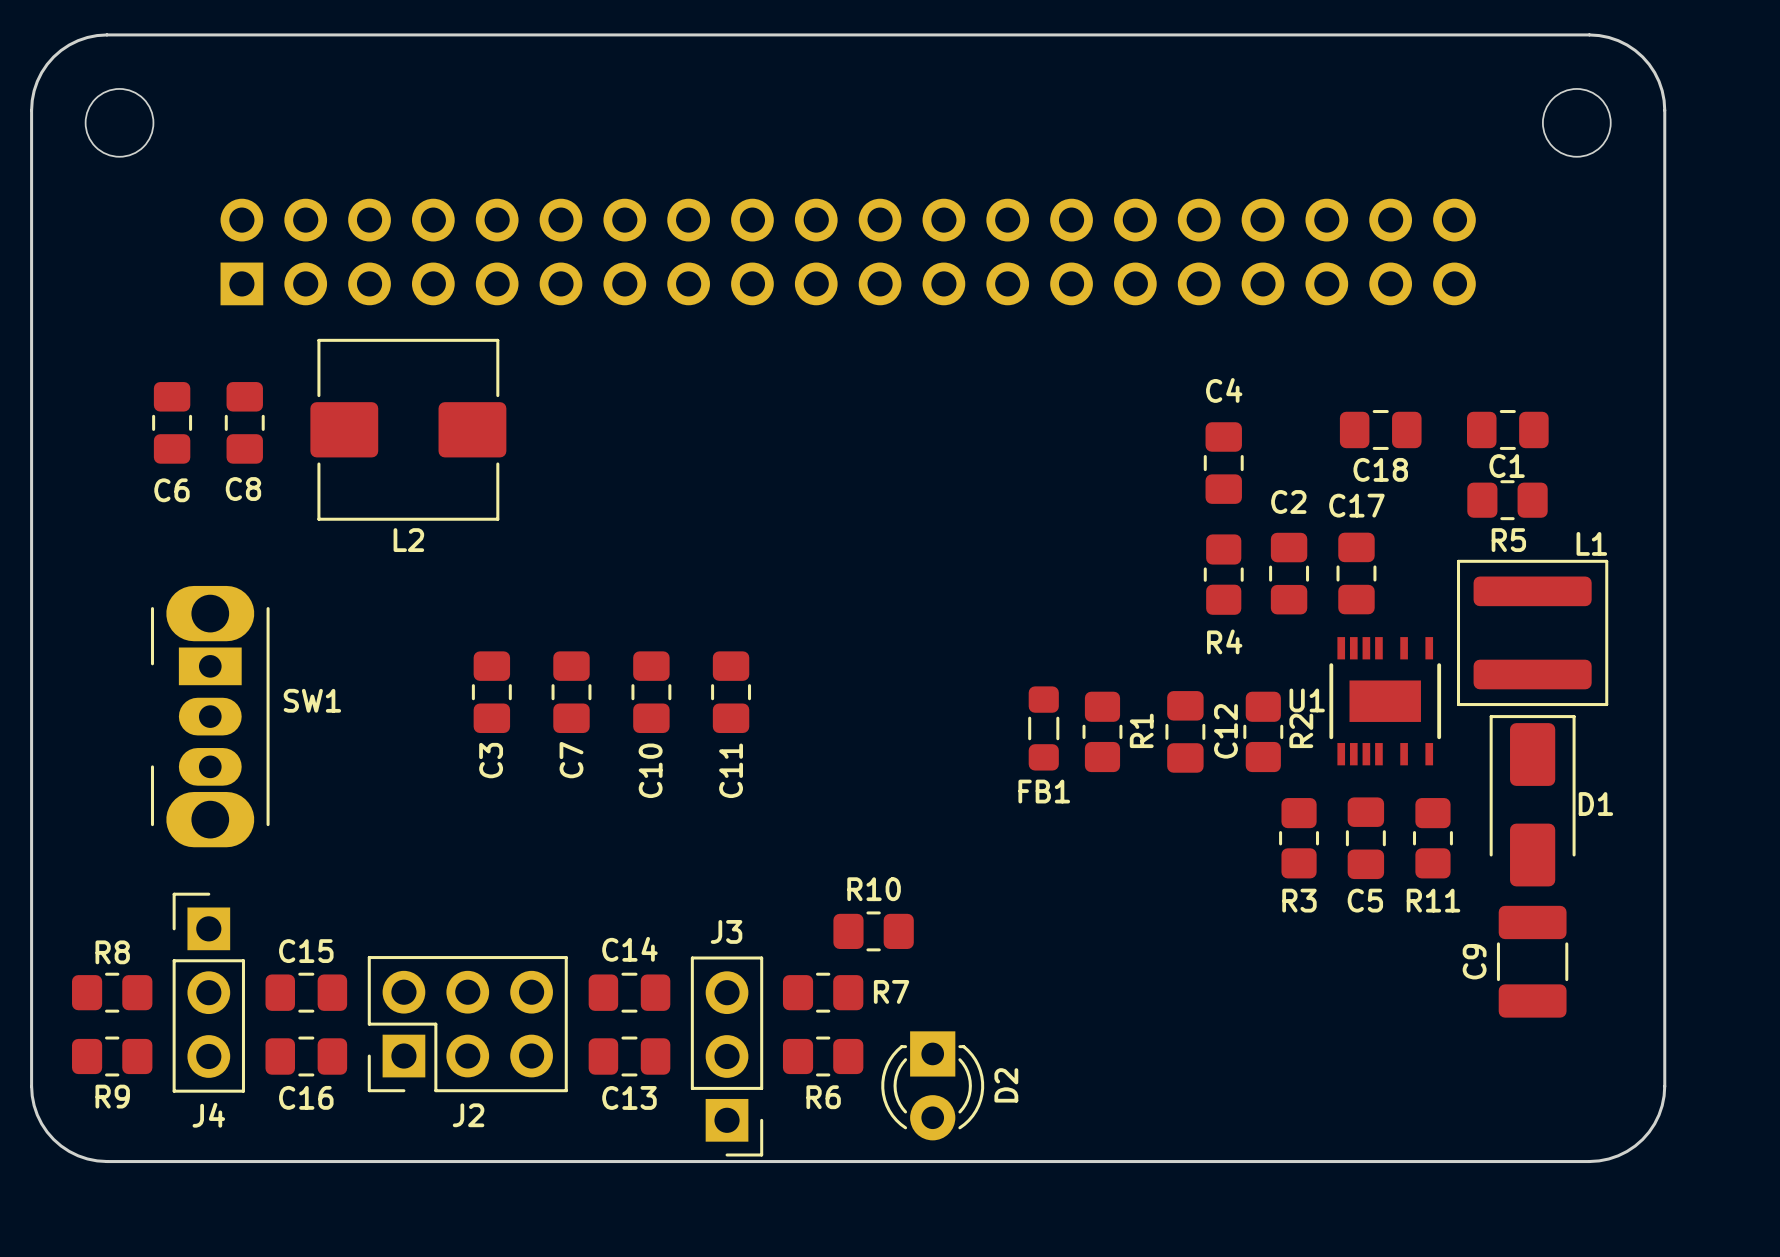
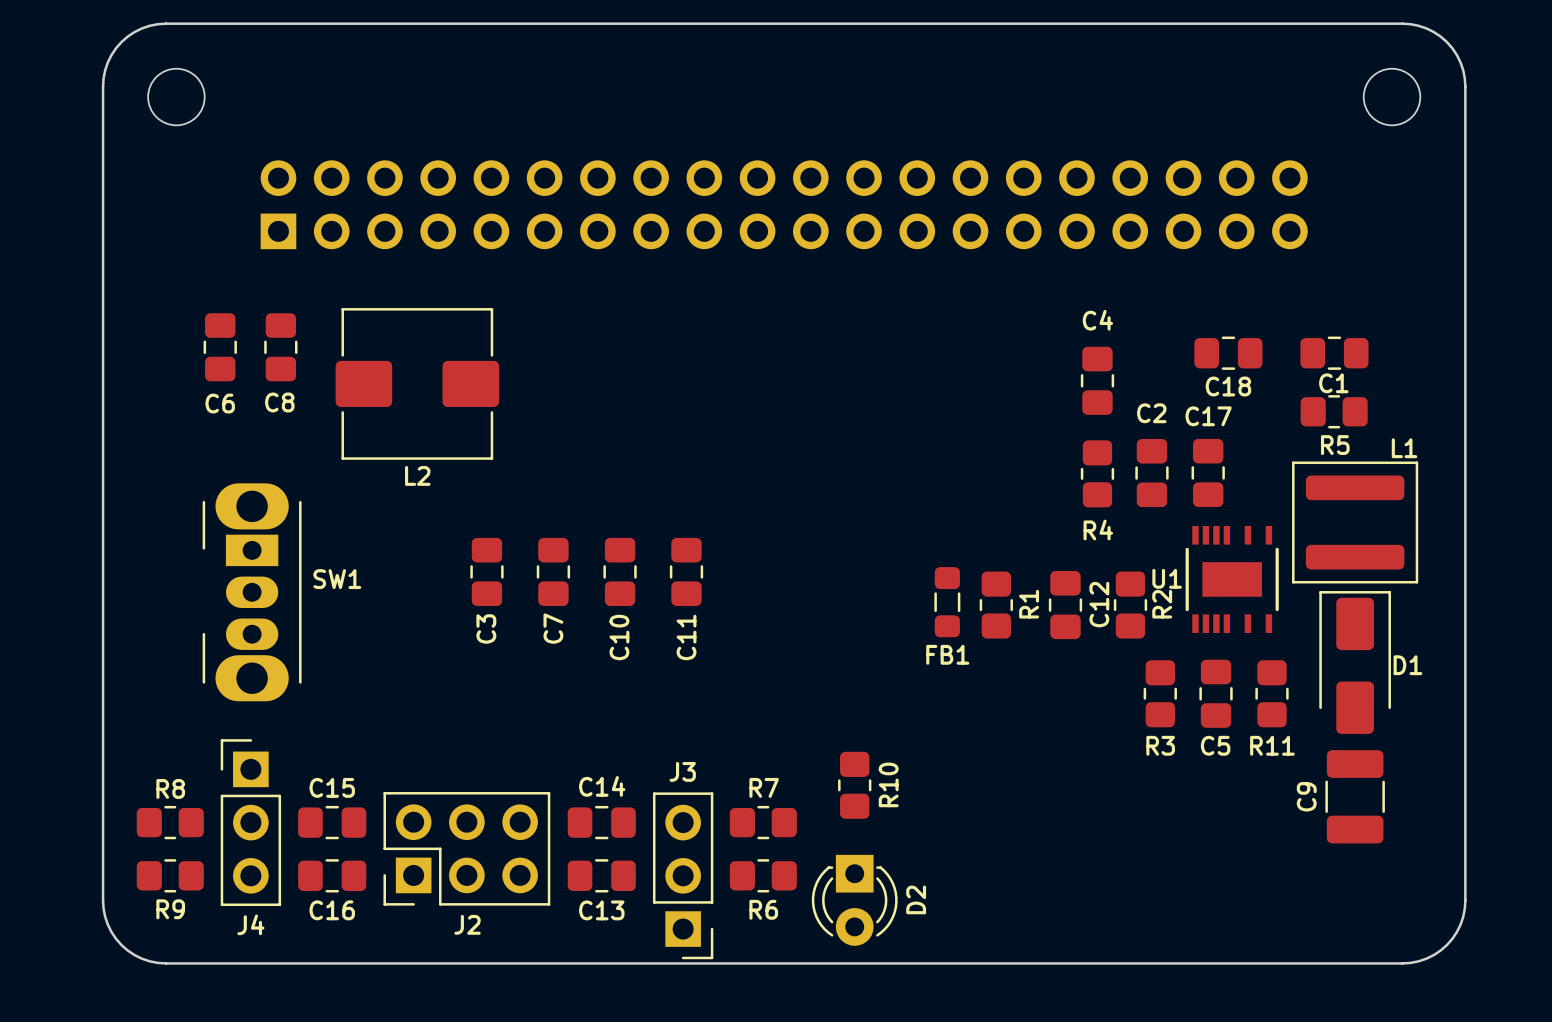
L2 position: (408, 429) -> (417, 383)
R10 rotation: 0° (873, 931) -> 90° clockwise (854, 785)
R10 position: (873, 931) -> (854, 785)
R7 name position: R7 (891, 991) -> R7 (764, 787)

